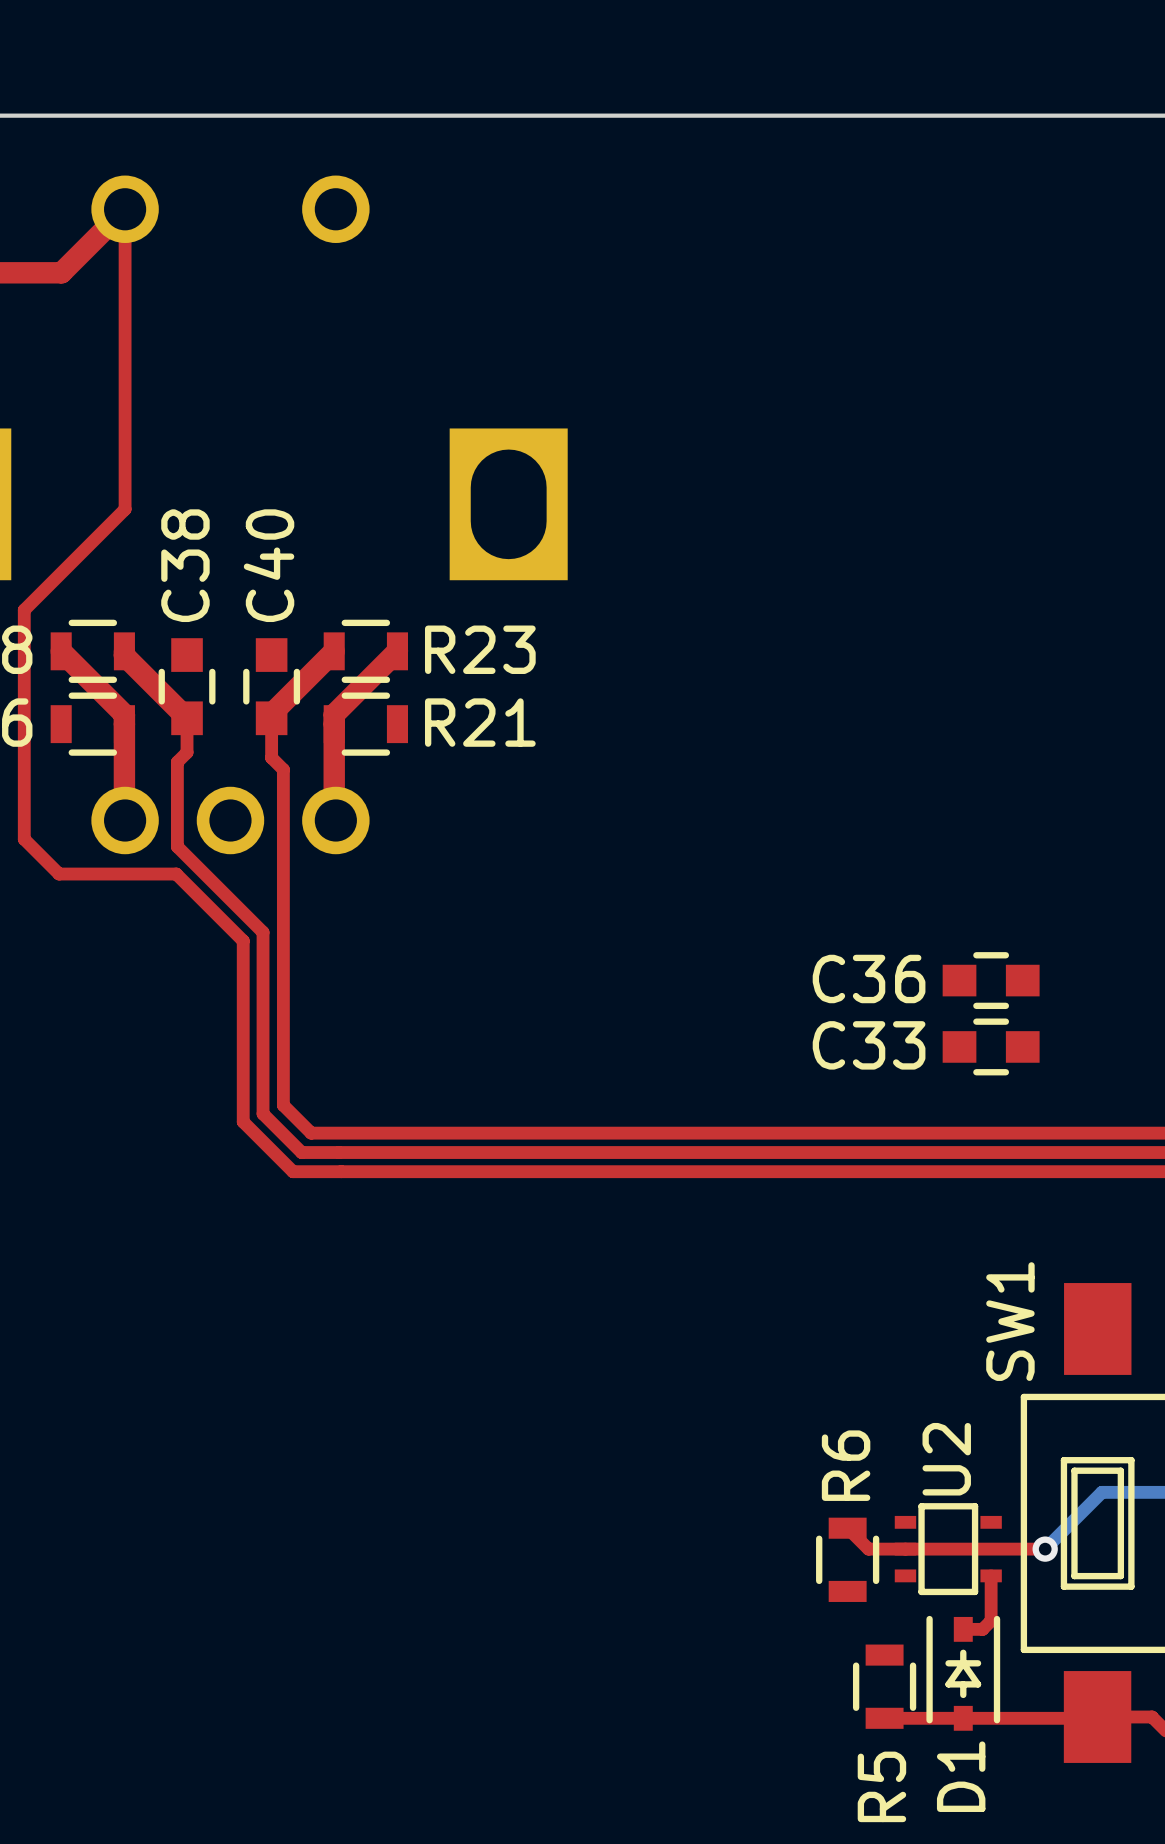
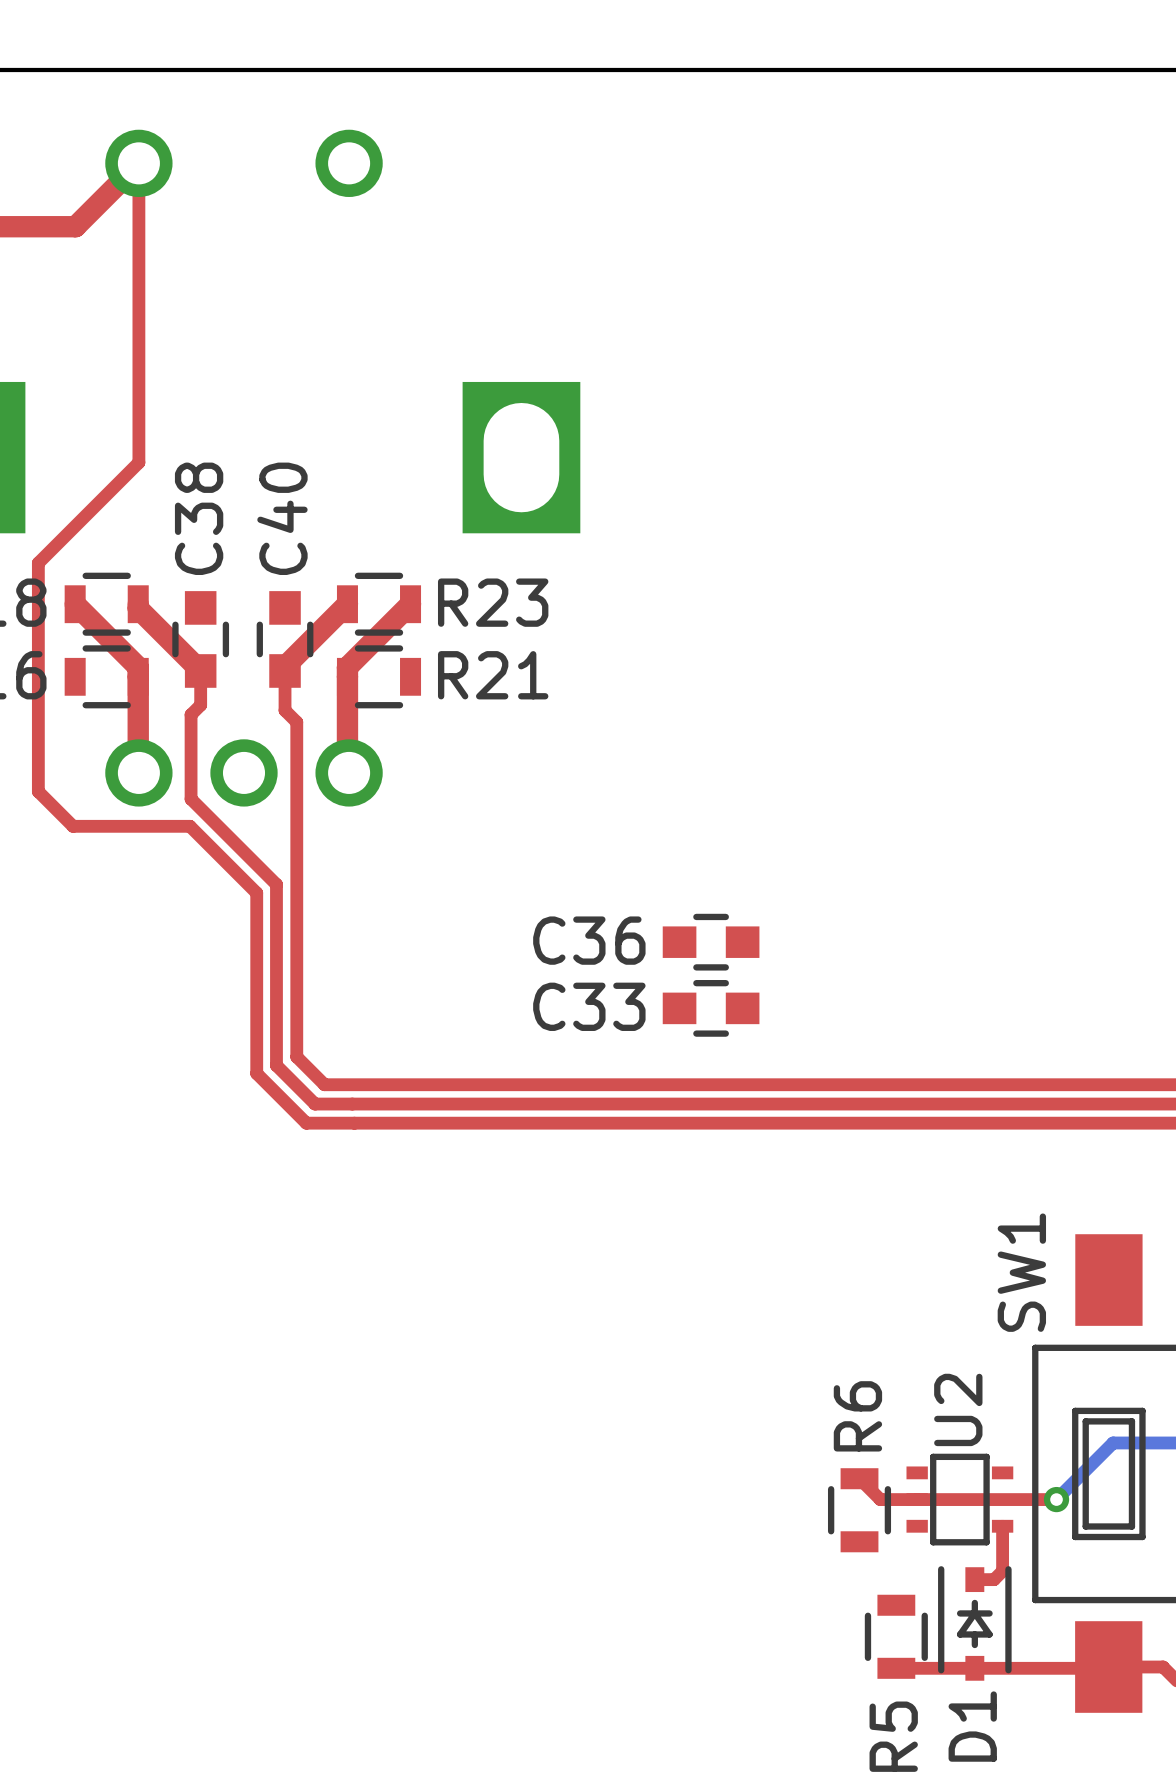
C36 position: (991, 980) -> (711, 942)
C33 position: (991, 1046) -> (711, 1008)

